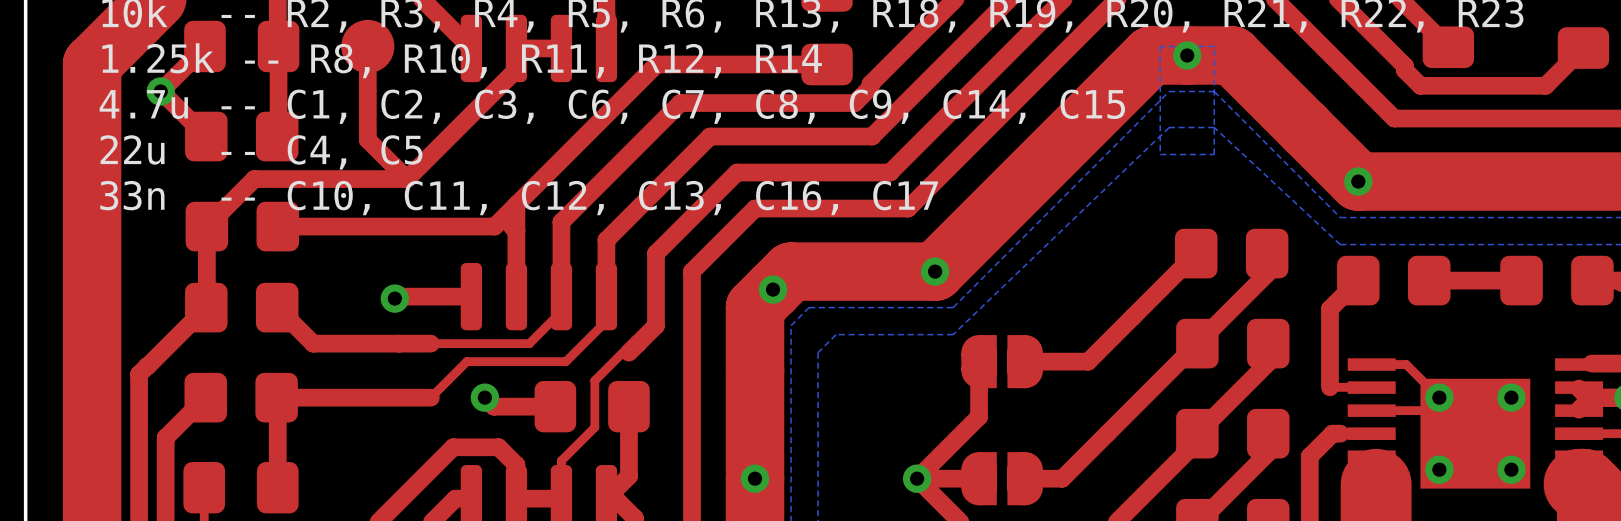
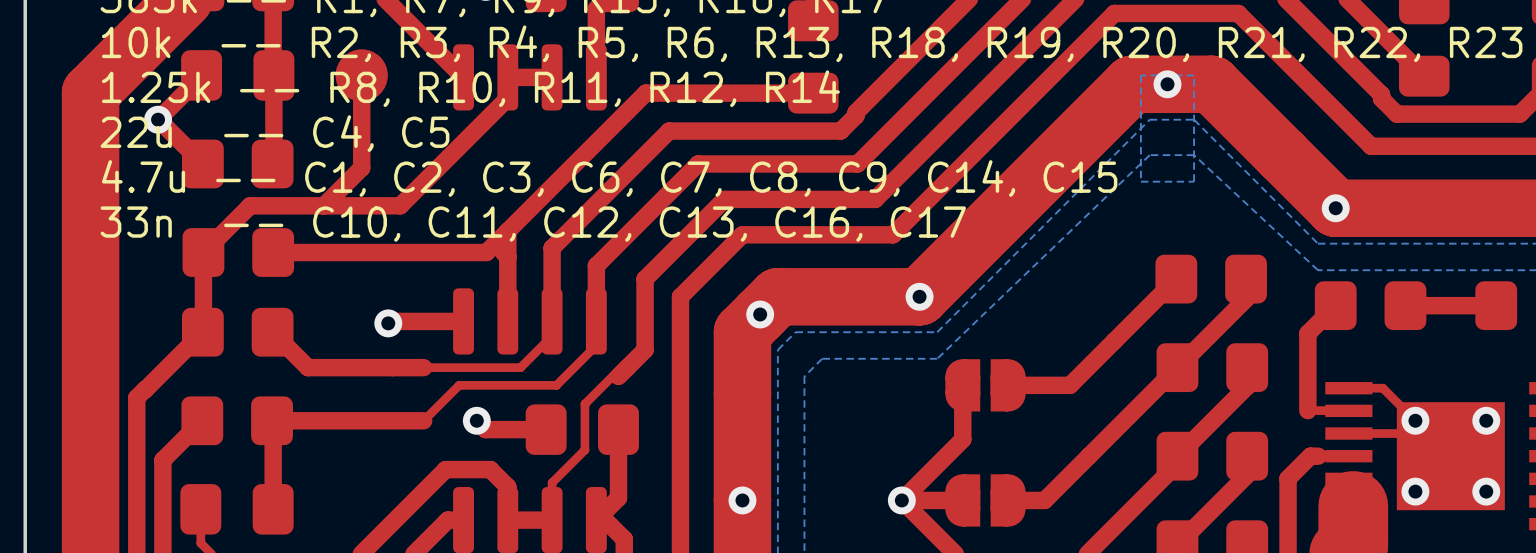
text: 4.7u -- C1, C2, C3, C6, C7, C8, C9, C14, C15 (612, 106) -> 22u -- C4, C5 (274, 133)
top track: (367, 139) (407, 179) -> (361, 167) (323, 205)
text: 22u -- C4, C5 (261, 152) -> 4.7u -- C1, C2, C3, C6, C7, C8, C9, C14, C15 (609, 178)

